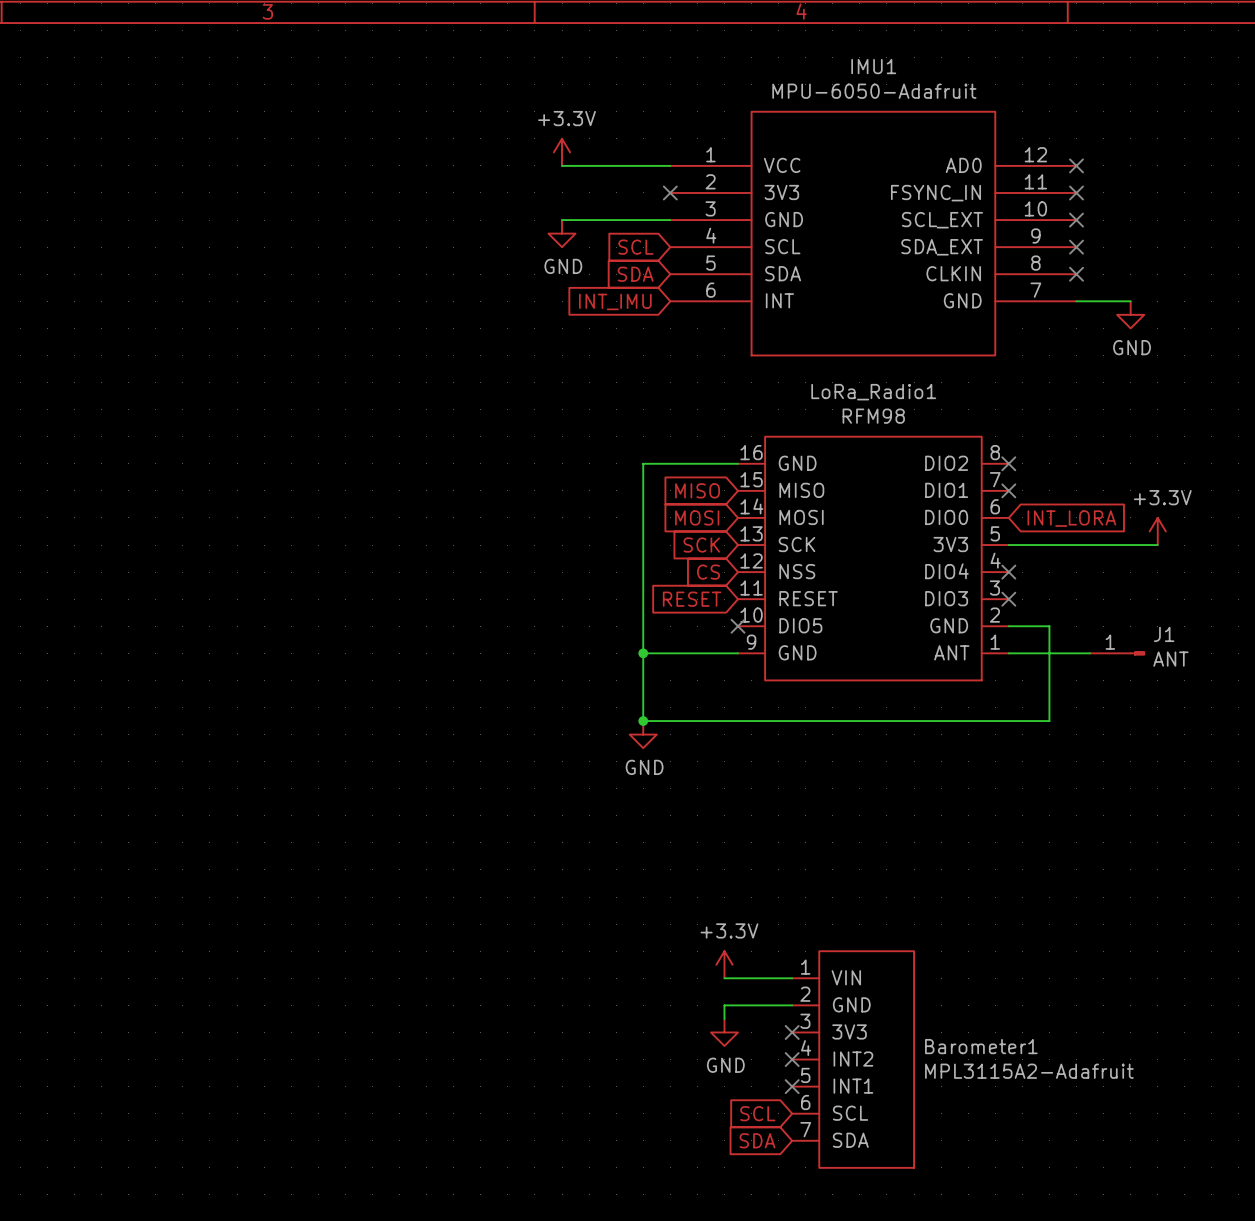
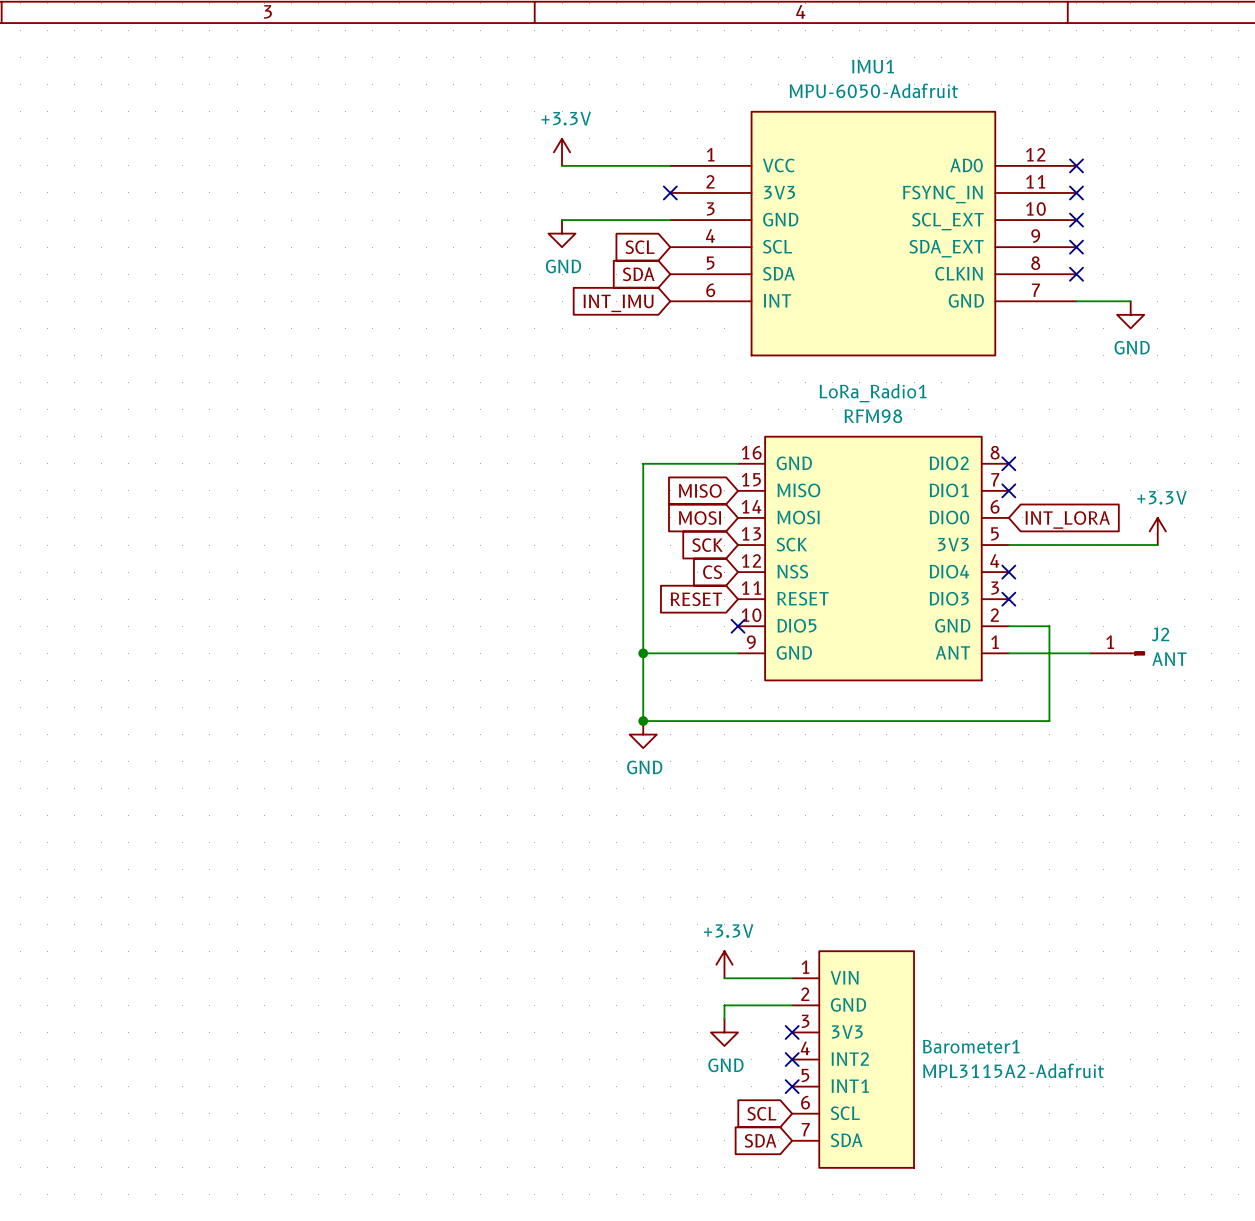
J1 name: J1 (1164, 634) -> J2 (1160, 634)

